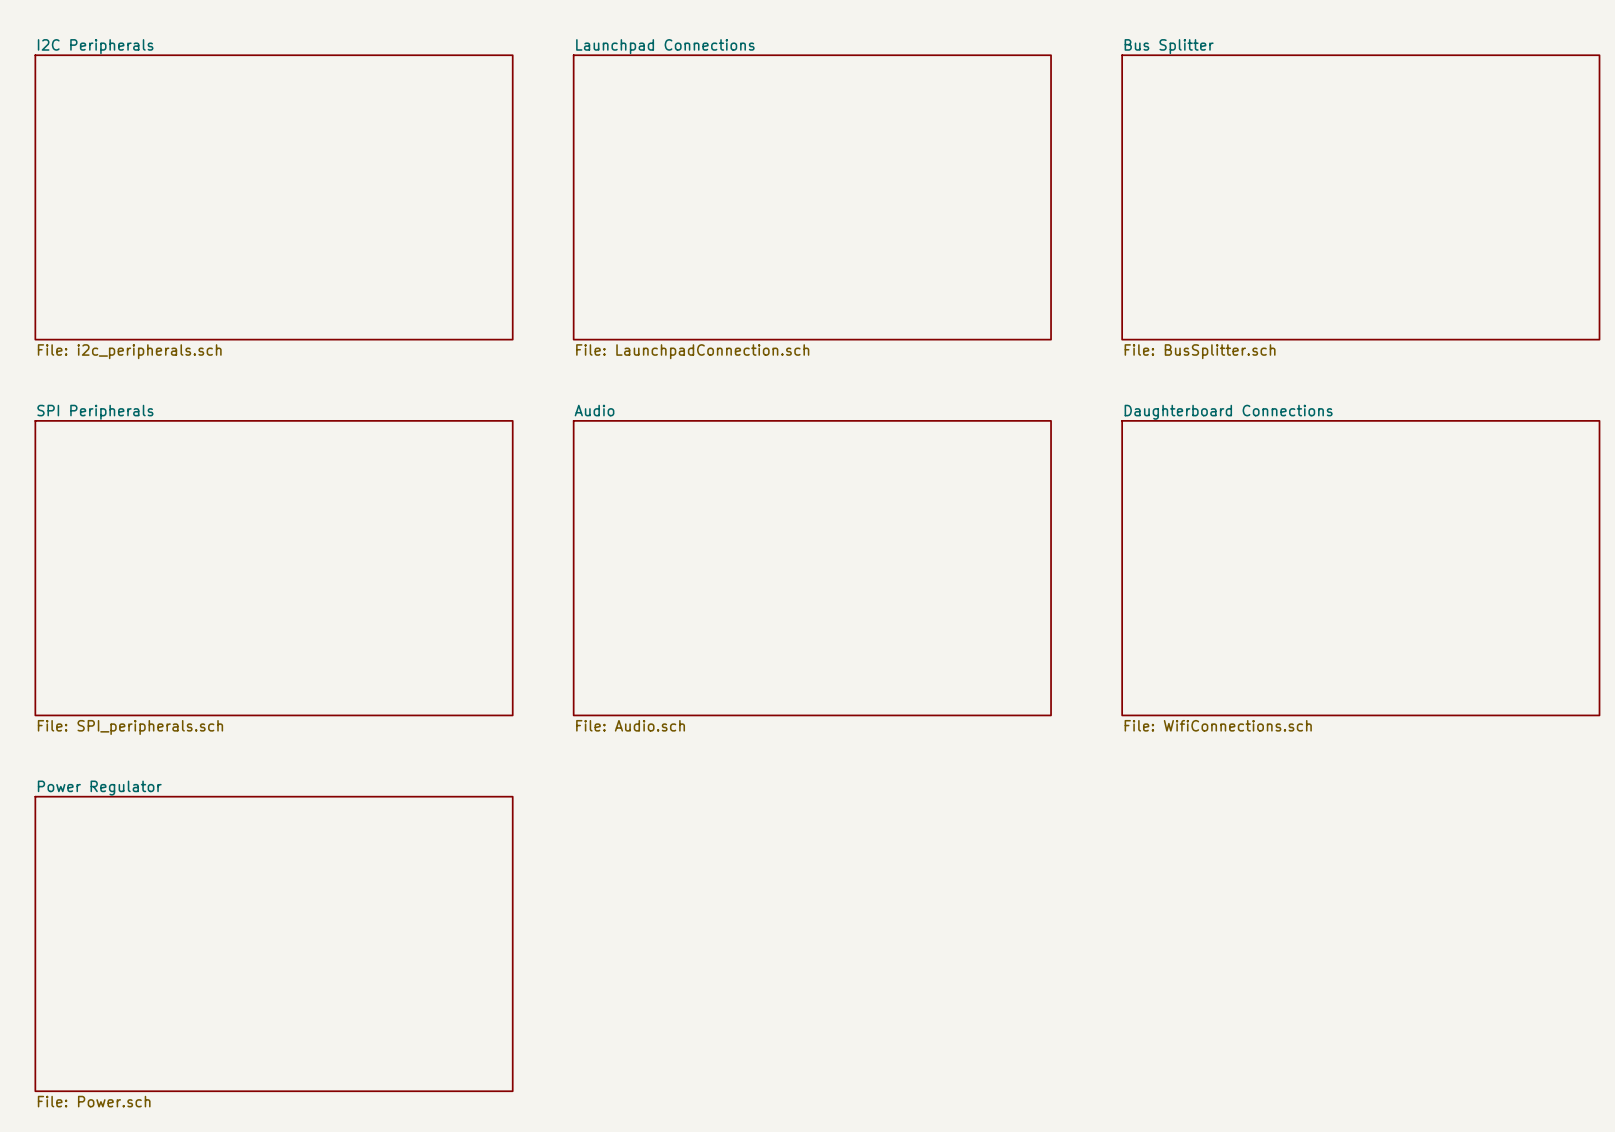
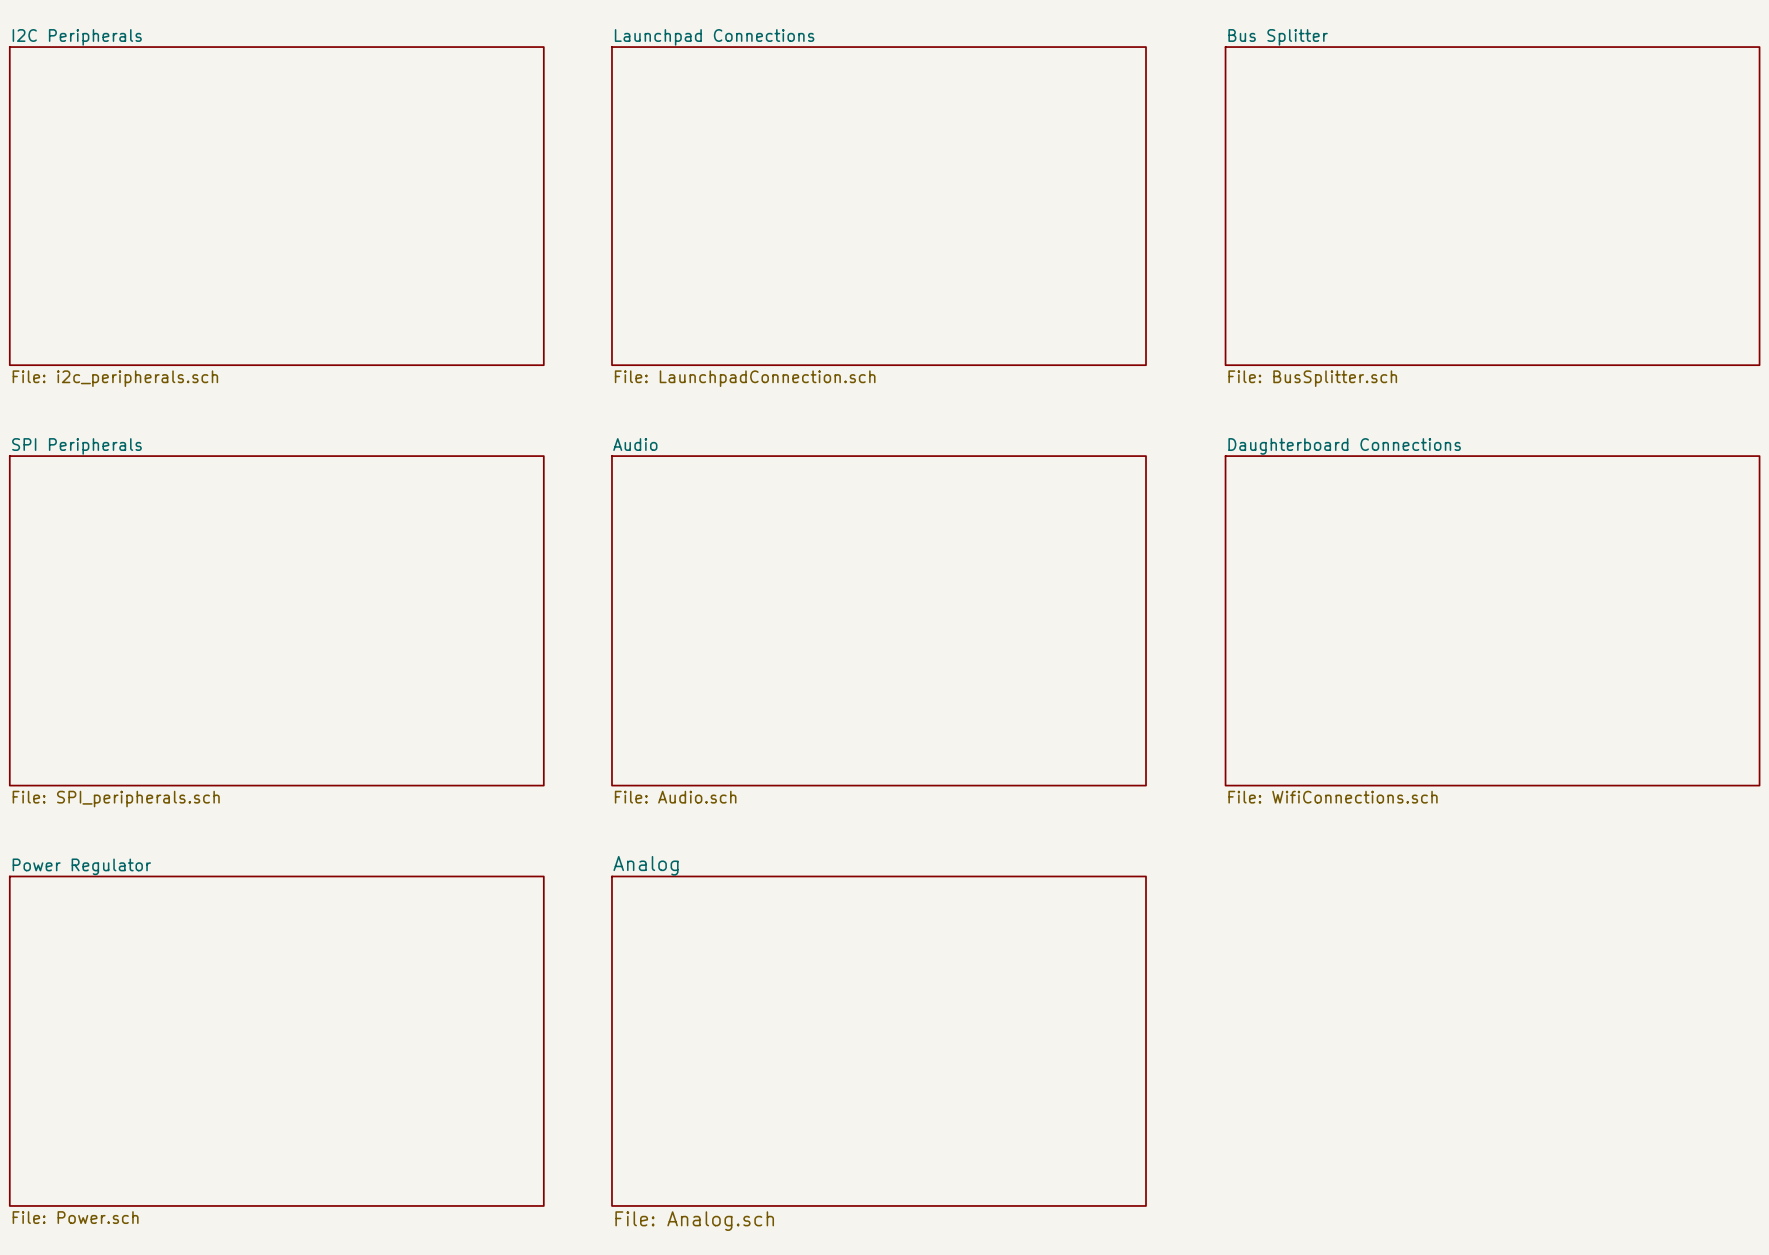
sheet Analog: none -> File: Analog.sch (878, 1041)

